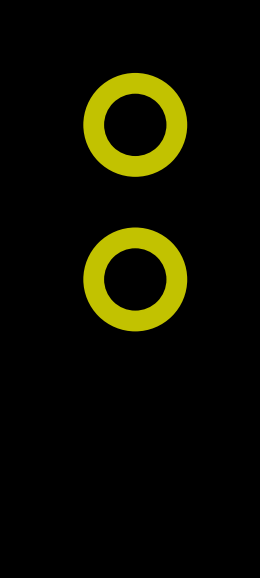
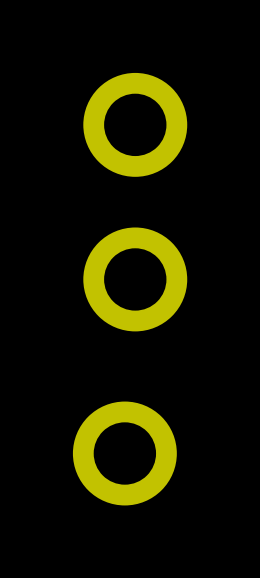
part: none -> (124, 453)

